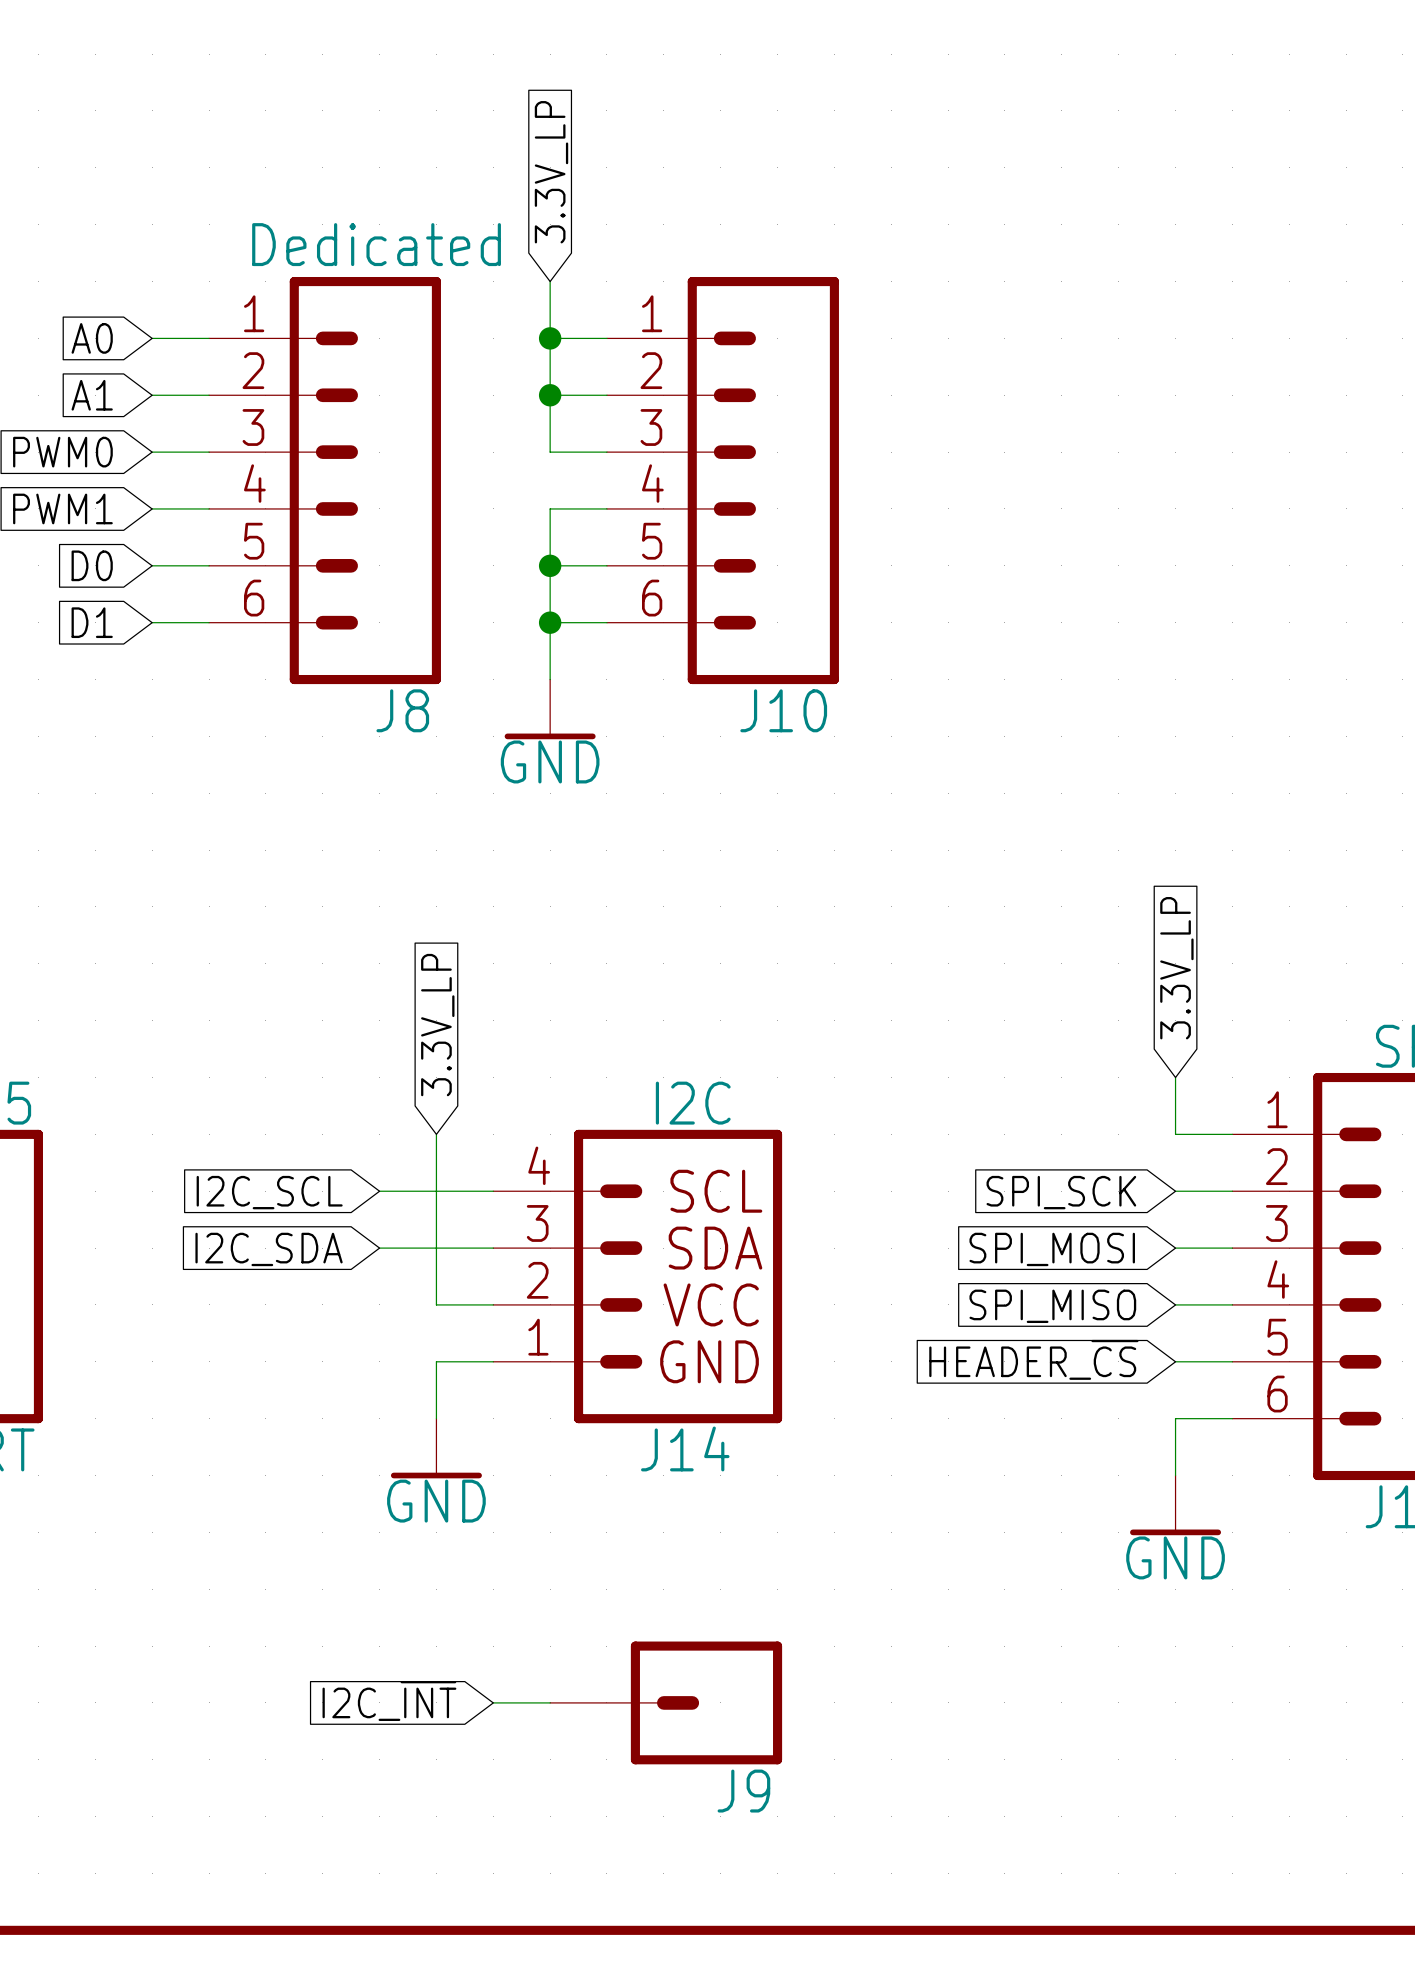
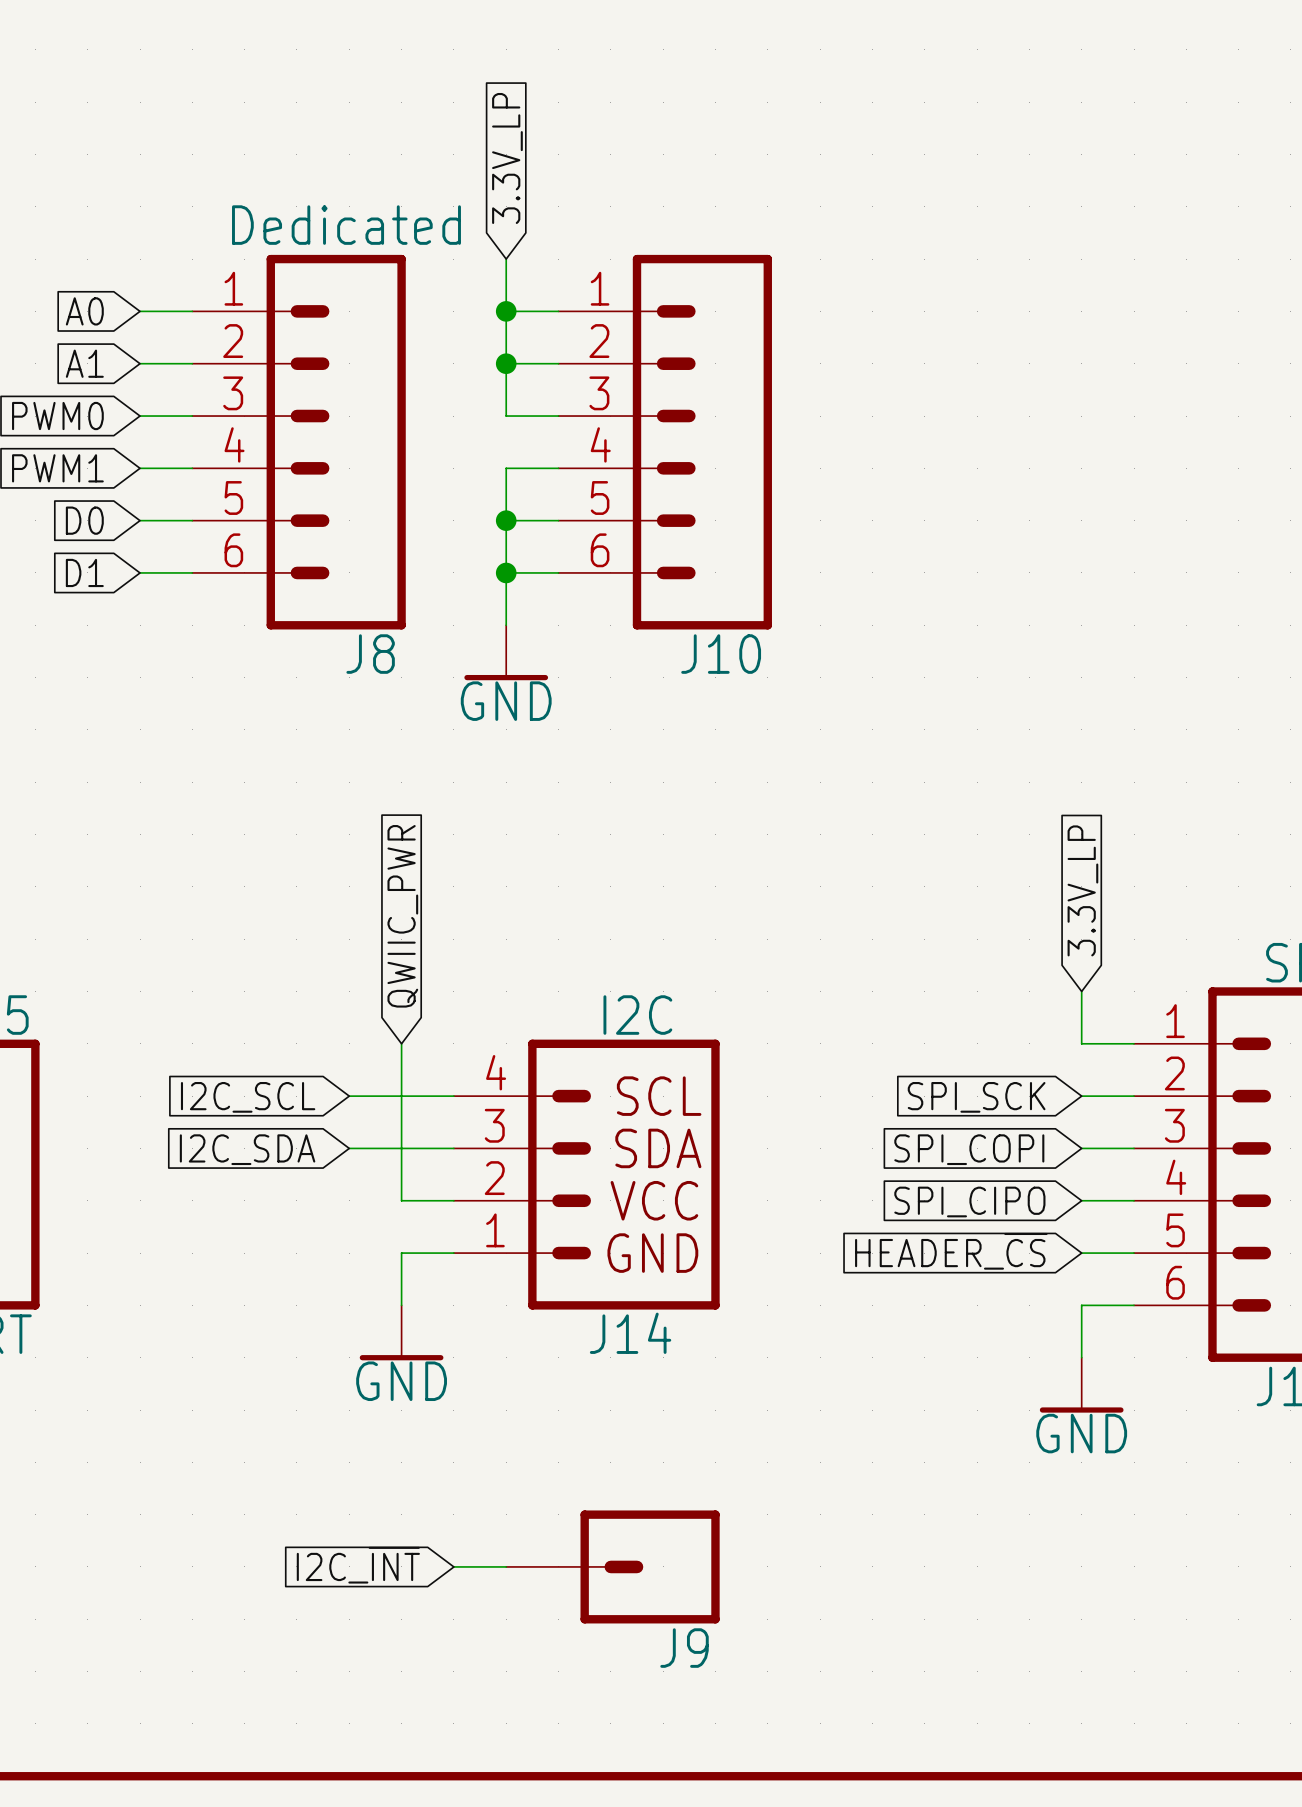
global label: 3.3V_LP (437, 1025) -> QWIIC_PWR (402, 916)
global label: SPI_MOSI (1052, 1249) -> SPI_COPI (969, 1149)
global label: SPI_MISO (1052, 1306) -> SPI_CIPO (969, 1201)

